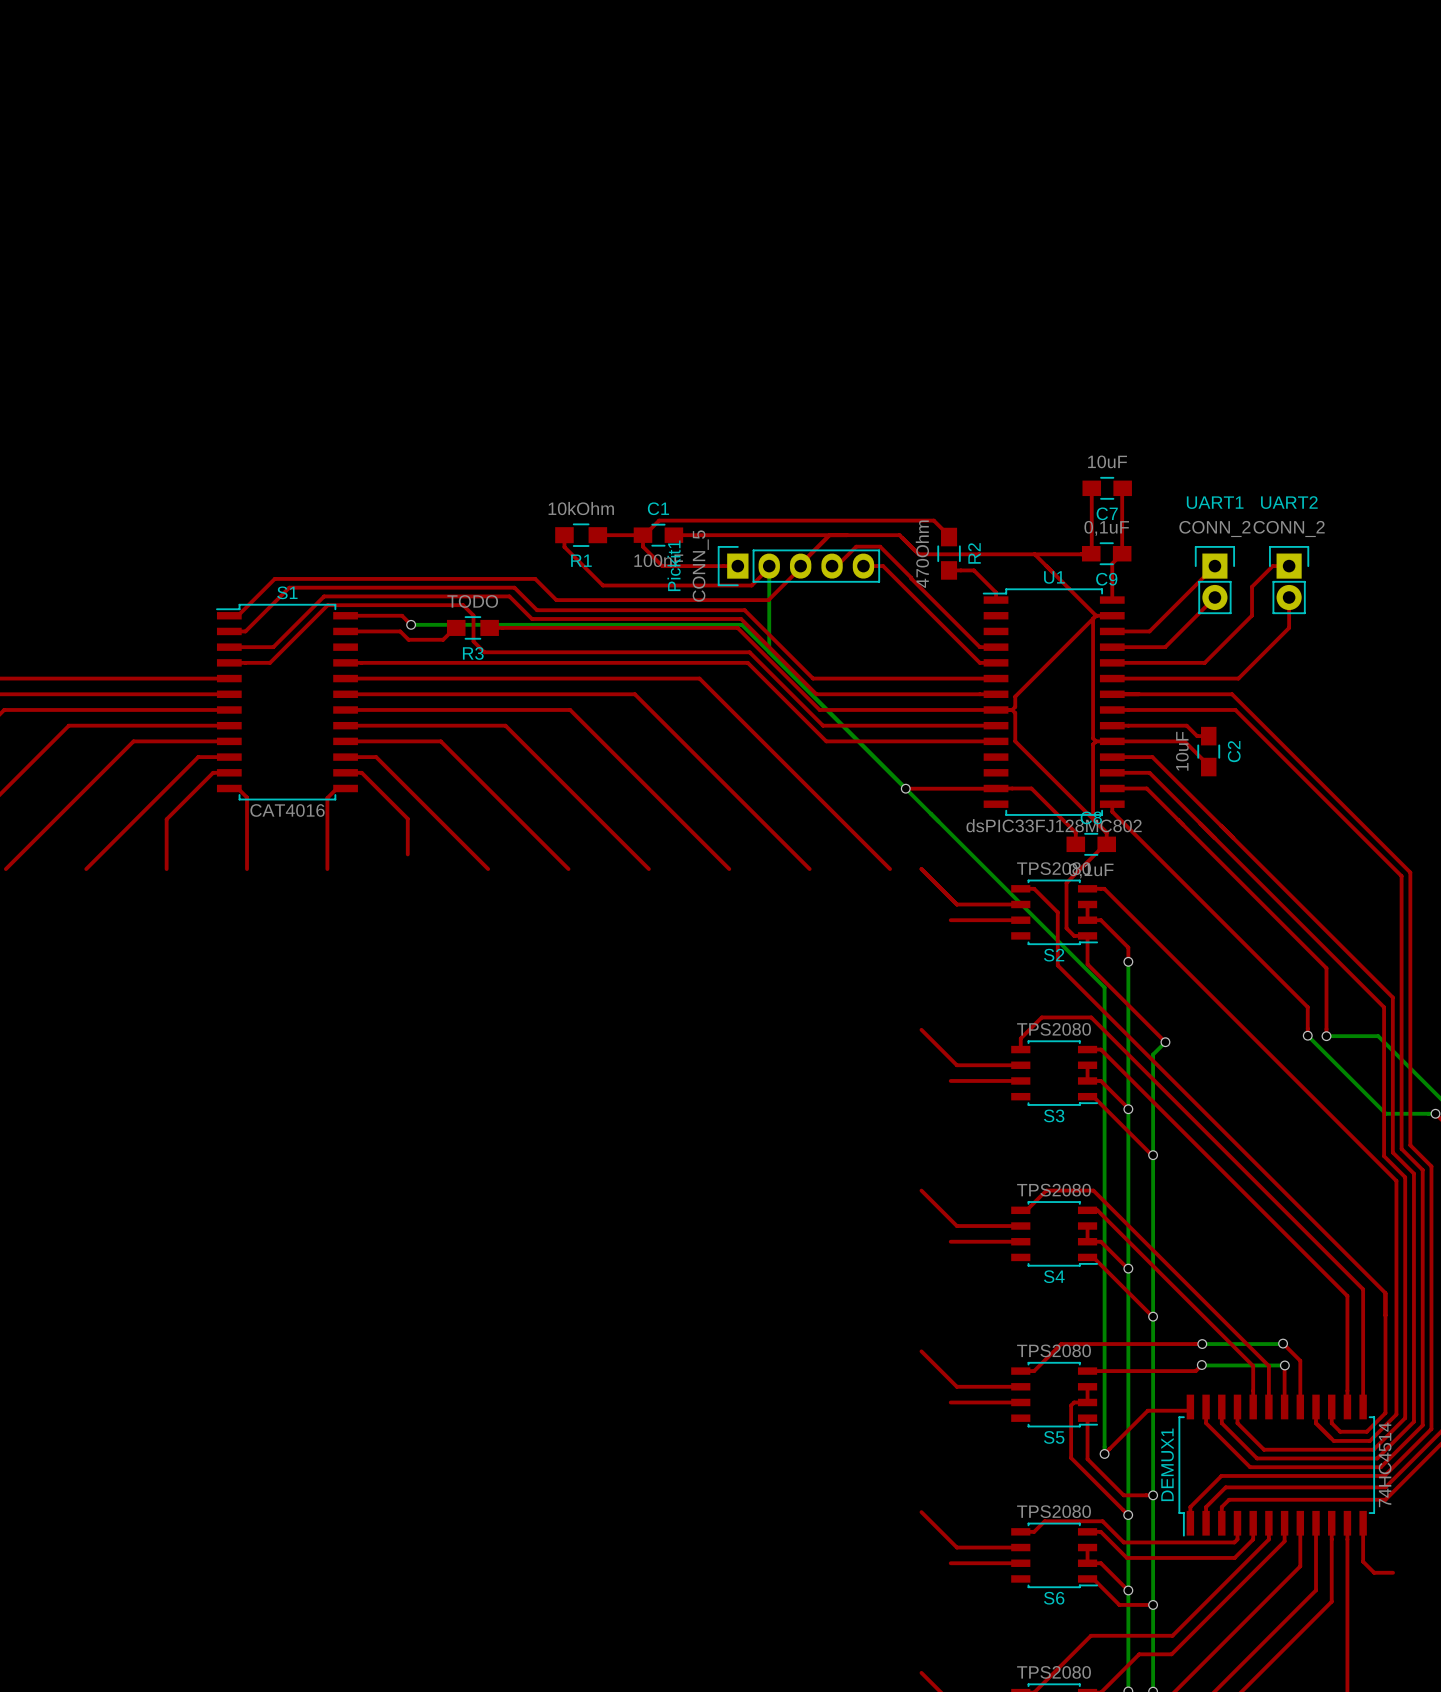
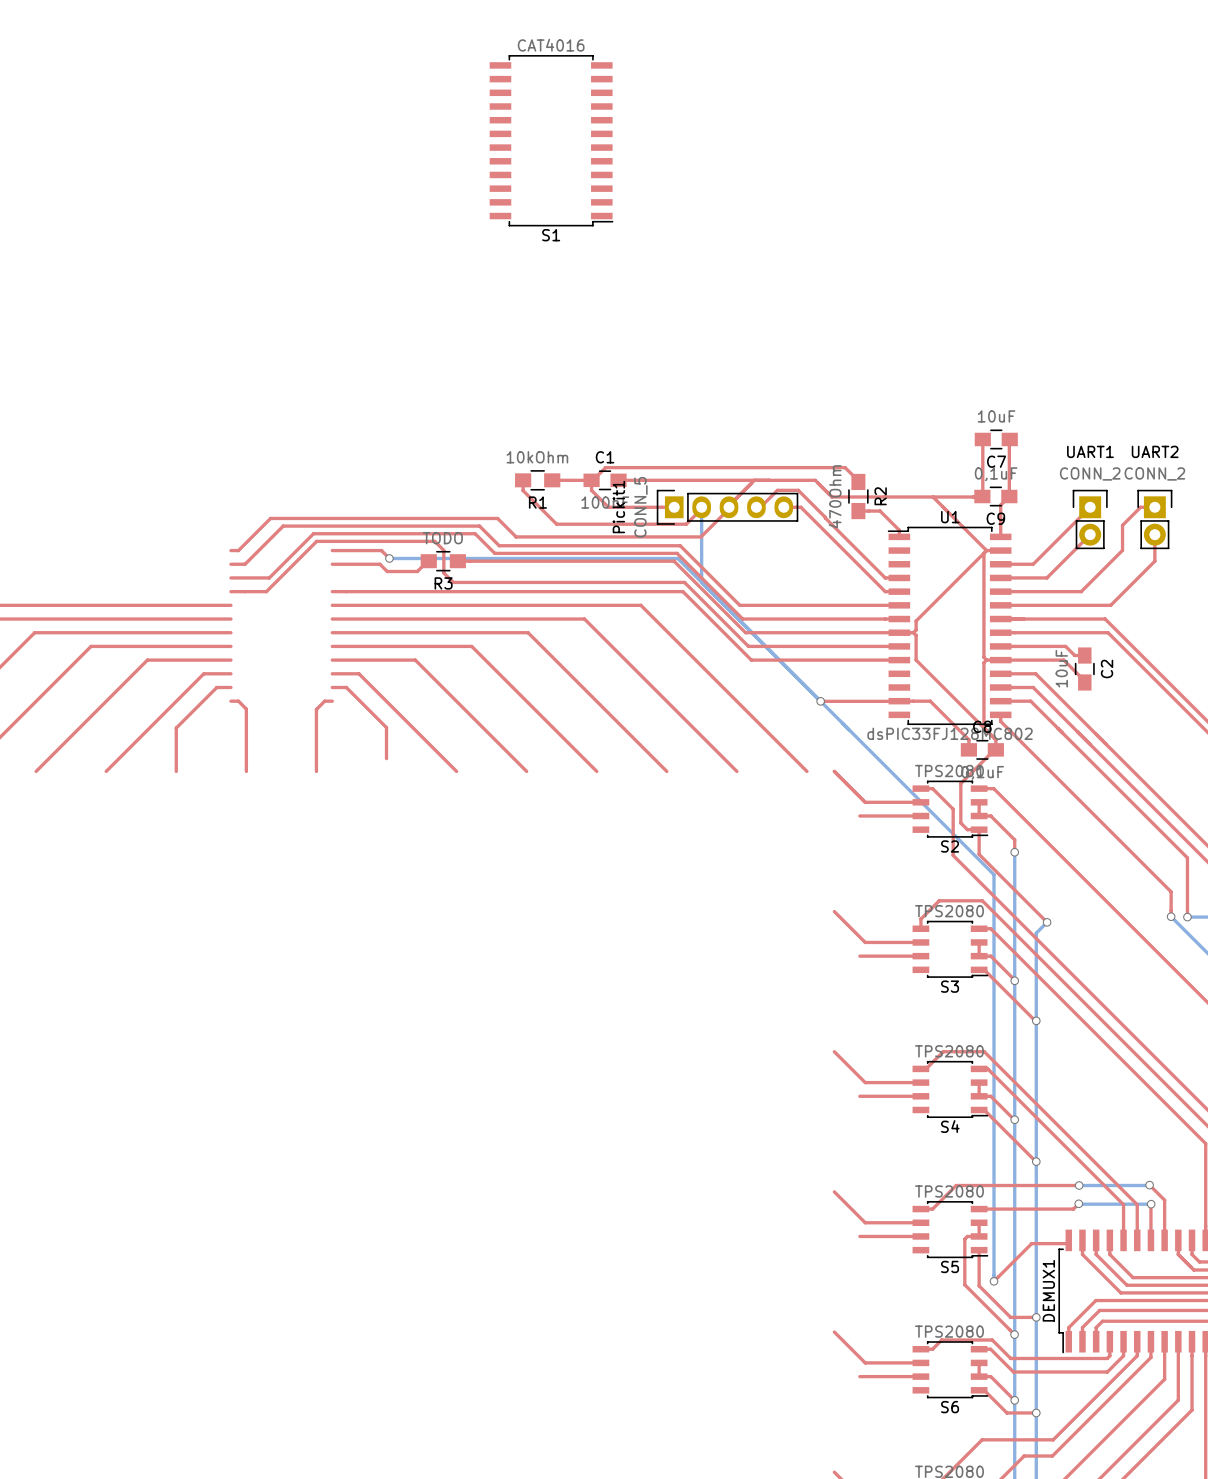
S1 rotation: 0° (286, 702) -> 180° (551, 140)
S1 position: (286, 702) -> (551, 140)

